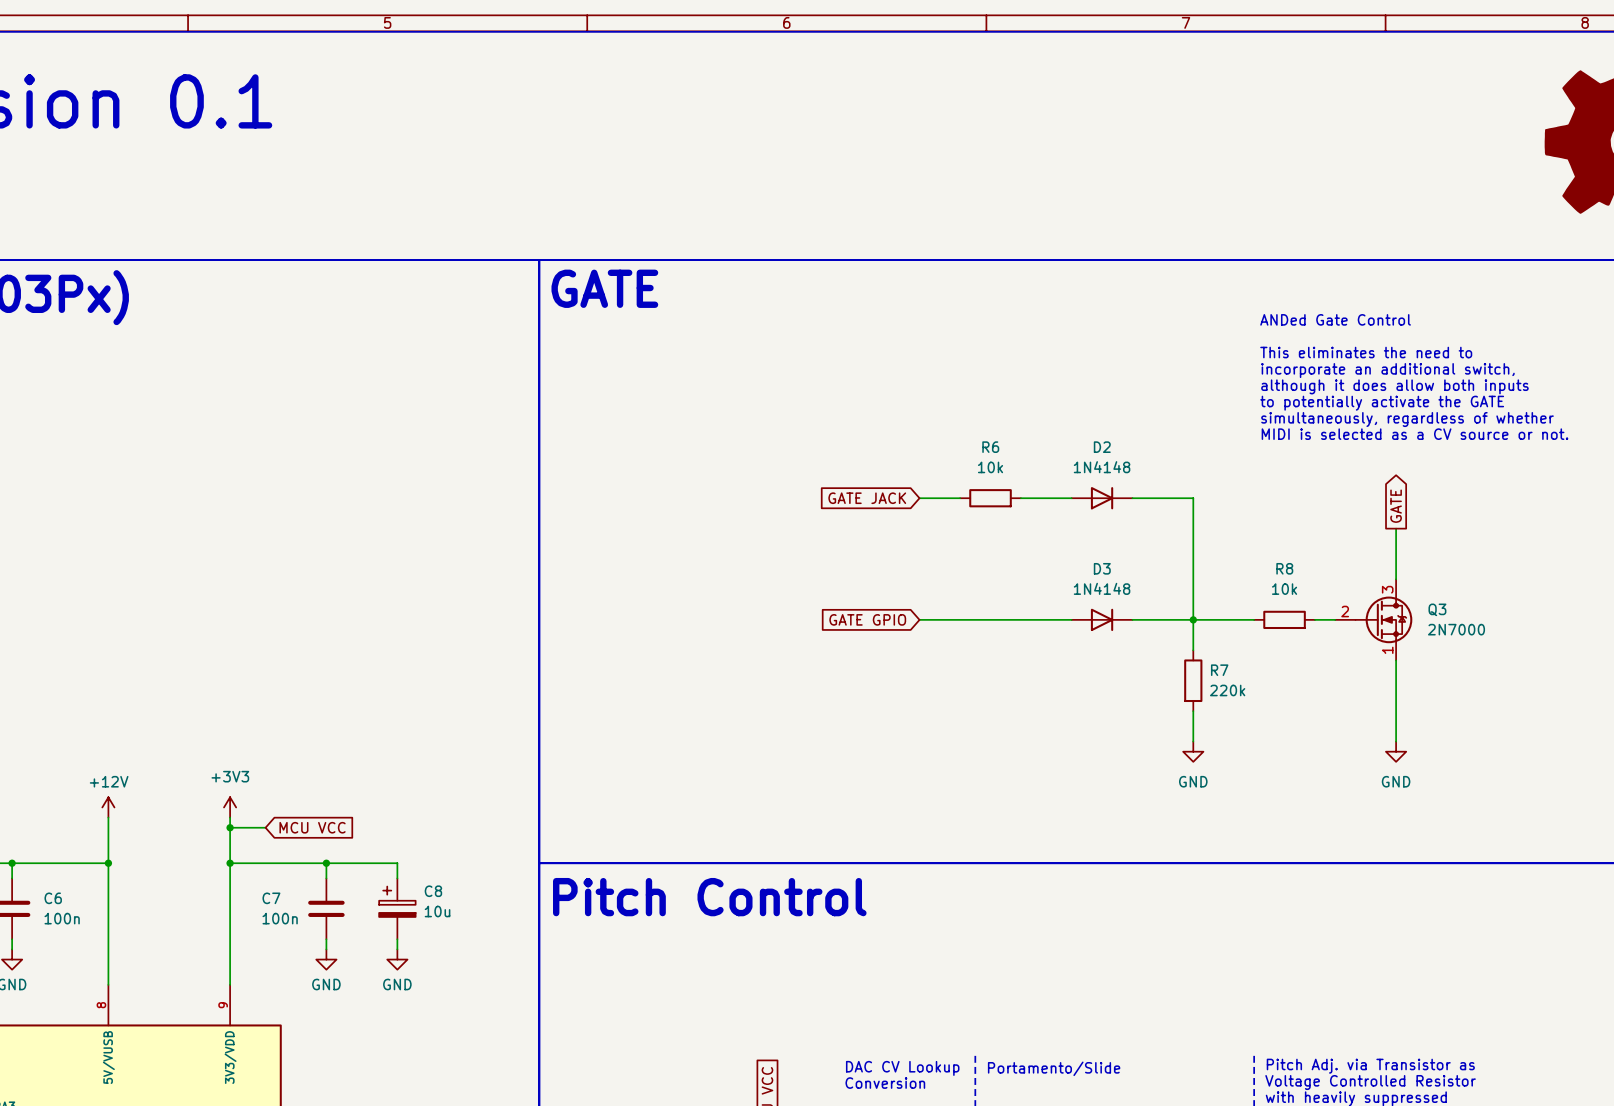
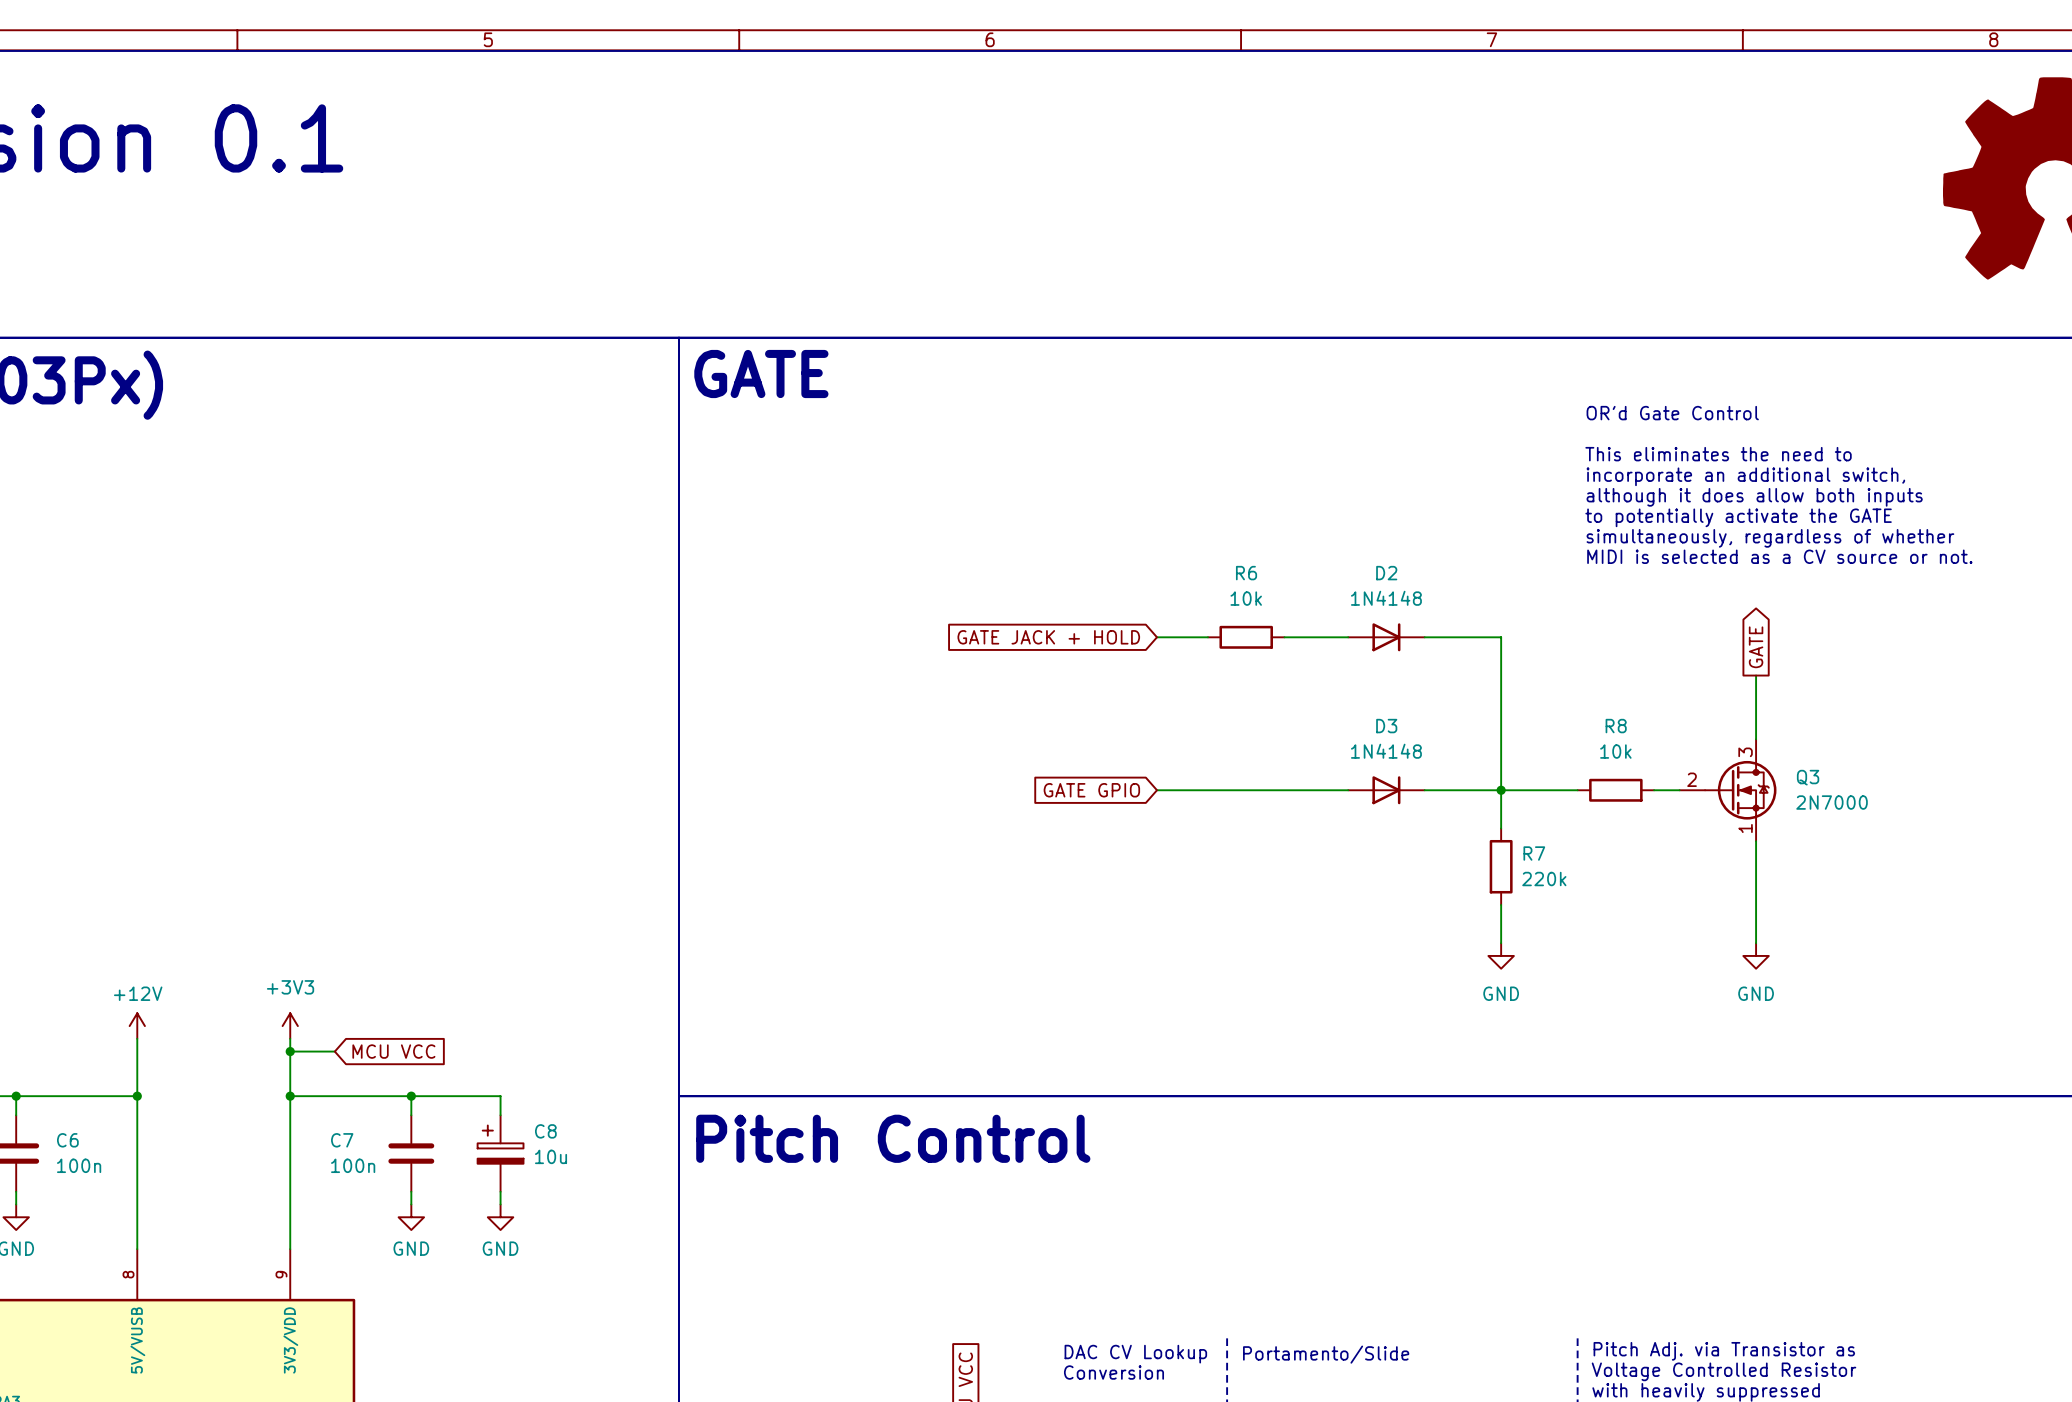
text: ANDed Gate Control (1335, 319) -> OR'd Gate Control (1672, 413)
global label: GATE JACK (867, 498) -> GATE JACK + HOLD (1048, 637)

